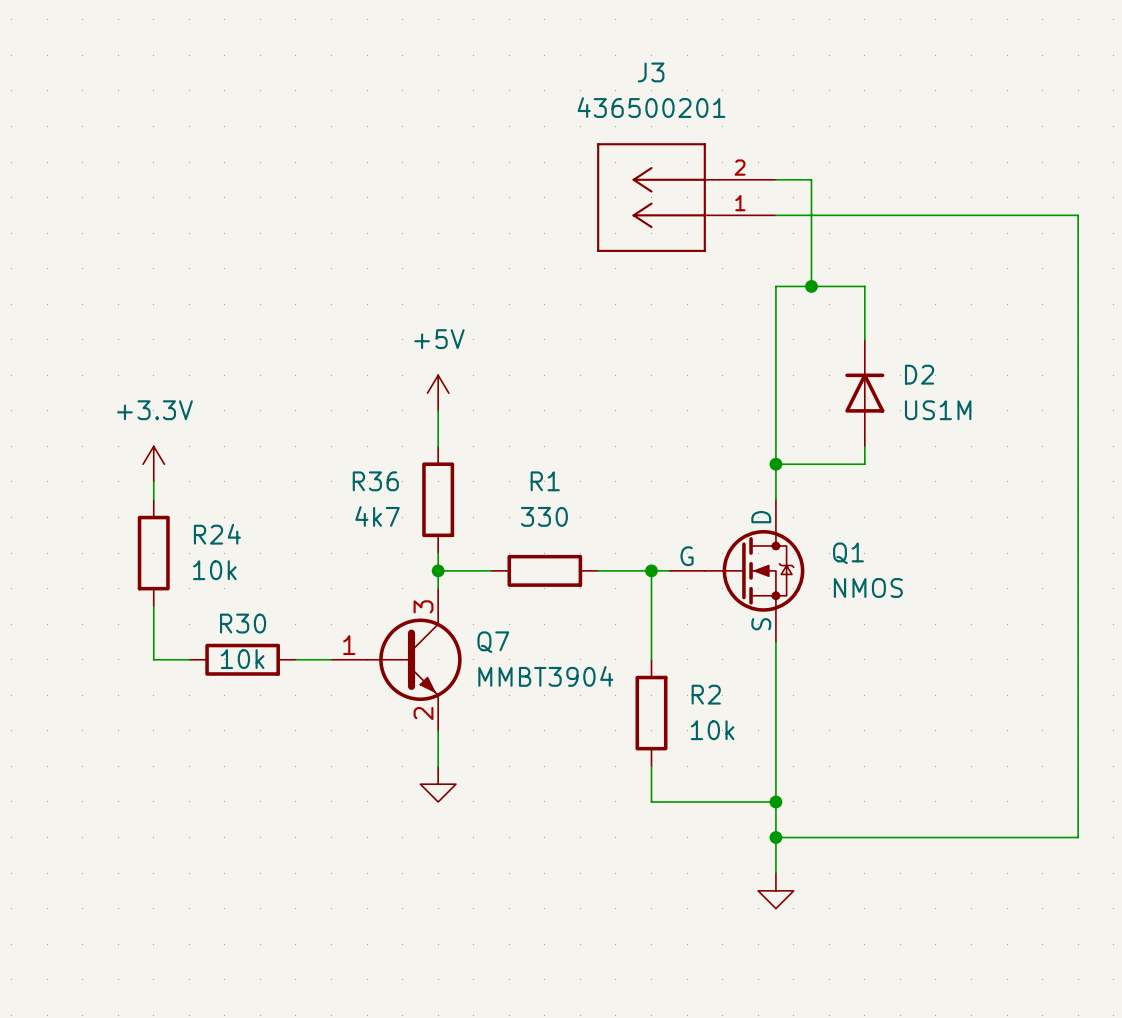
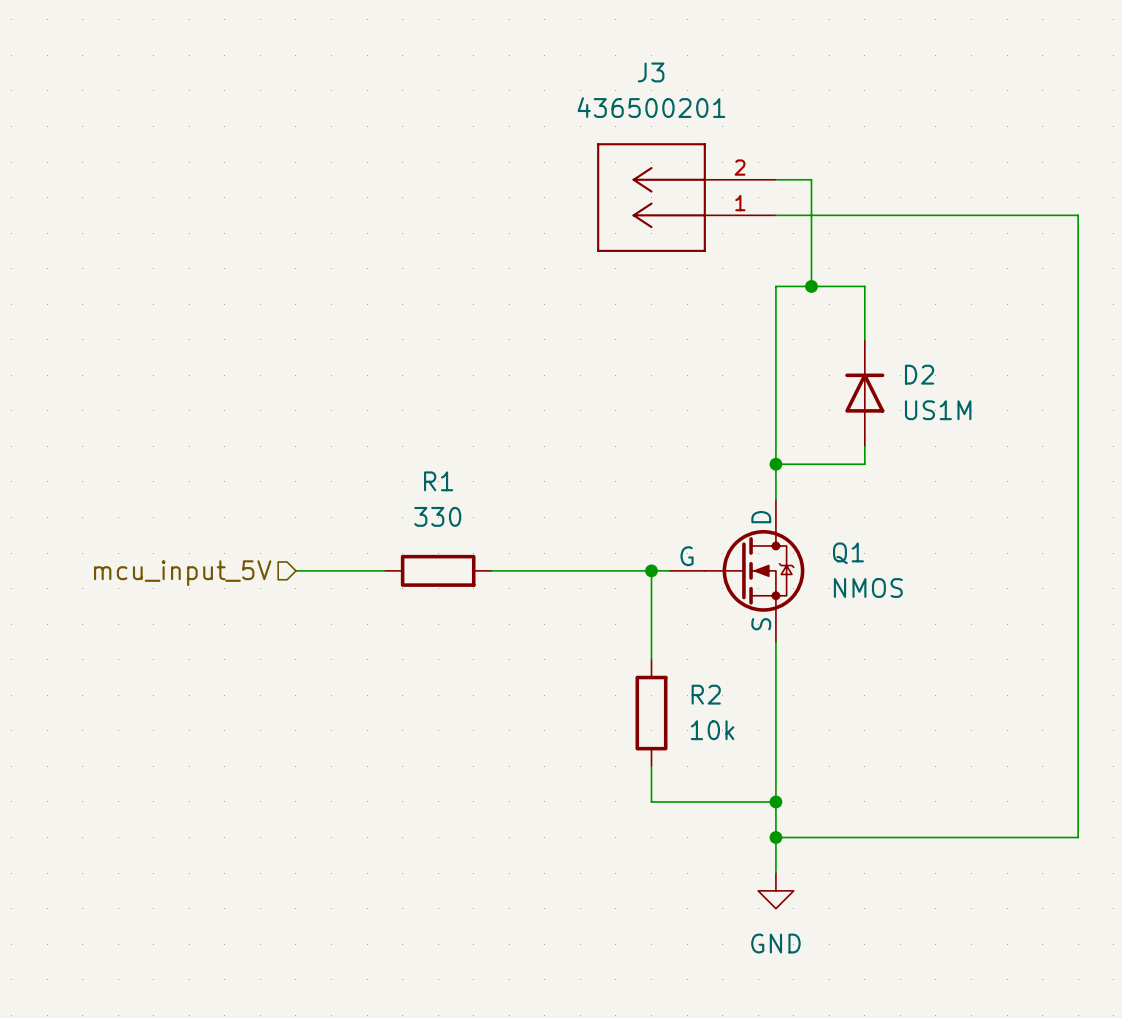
power symbol: +5V (438, 393) -> none
wire: (438, 410) (438, 446) -> none
power symbol: +3.3V (153, 464) -> none
wire: (153, 481) (153, 499) -> none
R36: 4k7 (438, 499) -> none
R24: 10k (153, 553) -> none
wire: (438, 553) (438, 588) -> none
wire: none -> (295, 570) (384, 570)
wire: (438, 570) (491, 570) -> (598, 570) (491, 570)
junction: (438, 570) -> none
R1 position: (544, 570) -> (438, 570)
hierarchical label: none -> mcu_input_5V (182, 573)
wire: (153, 606) (153, 659) (189, 659) -> none
R30: 10k (242, 659) -> none
wire: (295, 659) (331, 659) -> none
Q7: MMBT3904 (396, 659) -> none
wire: (438, 730) (438, 766) -> none
power symbol: (438, 784) -> none
power symbol text: none -> GND (775, 943)

